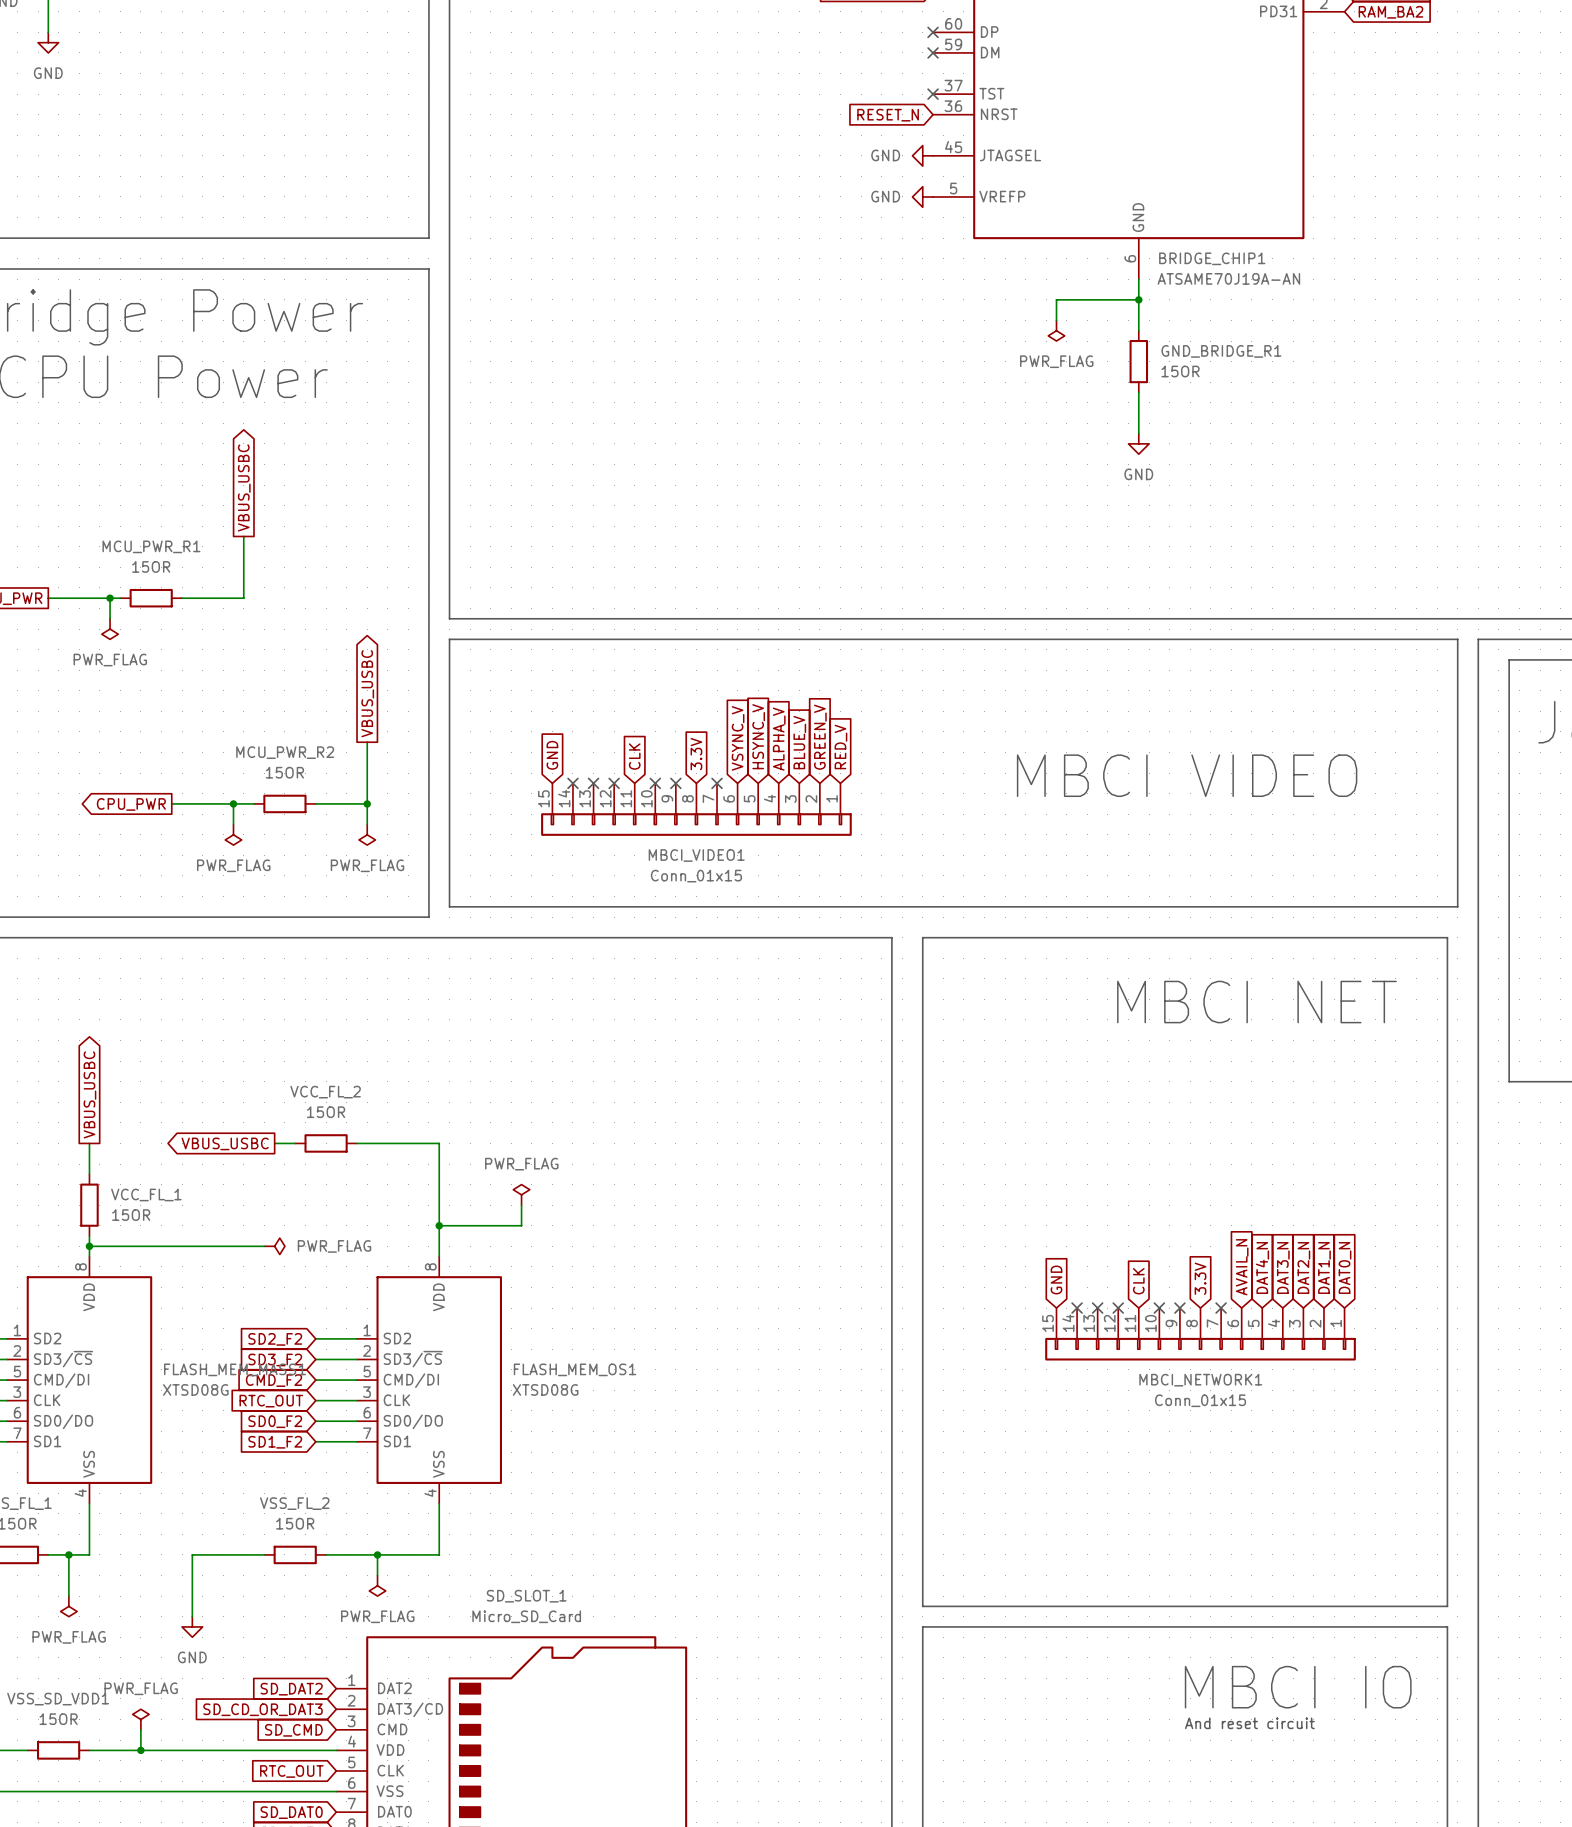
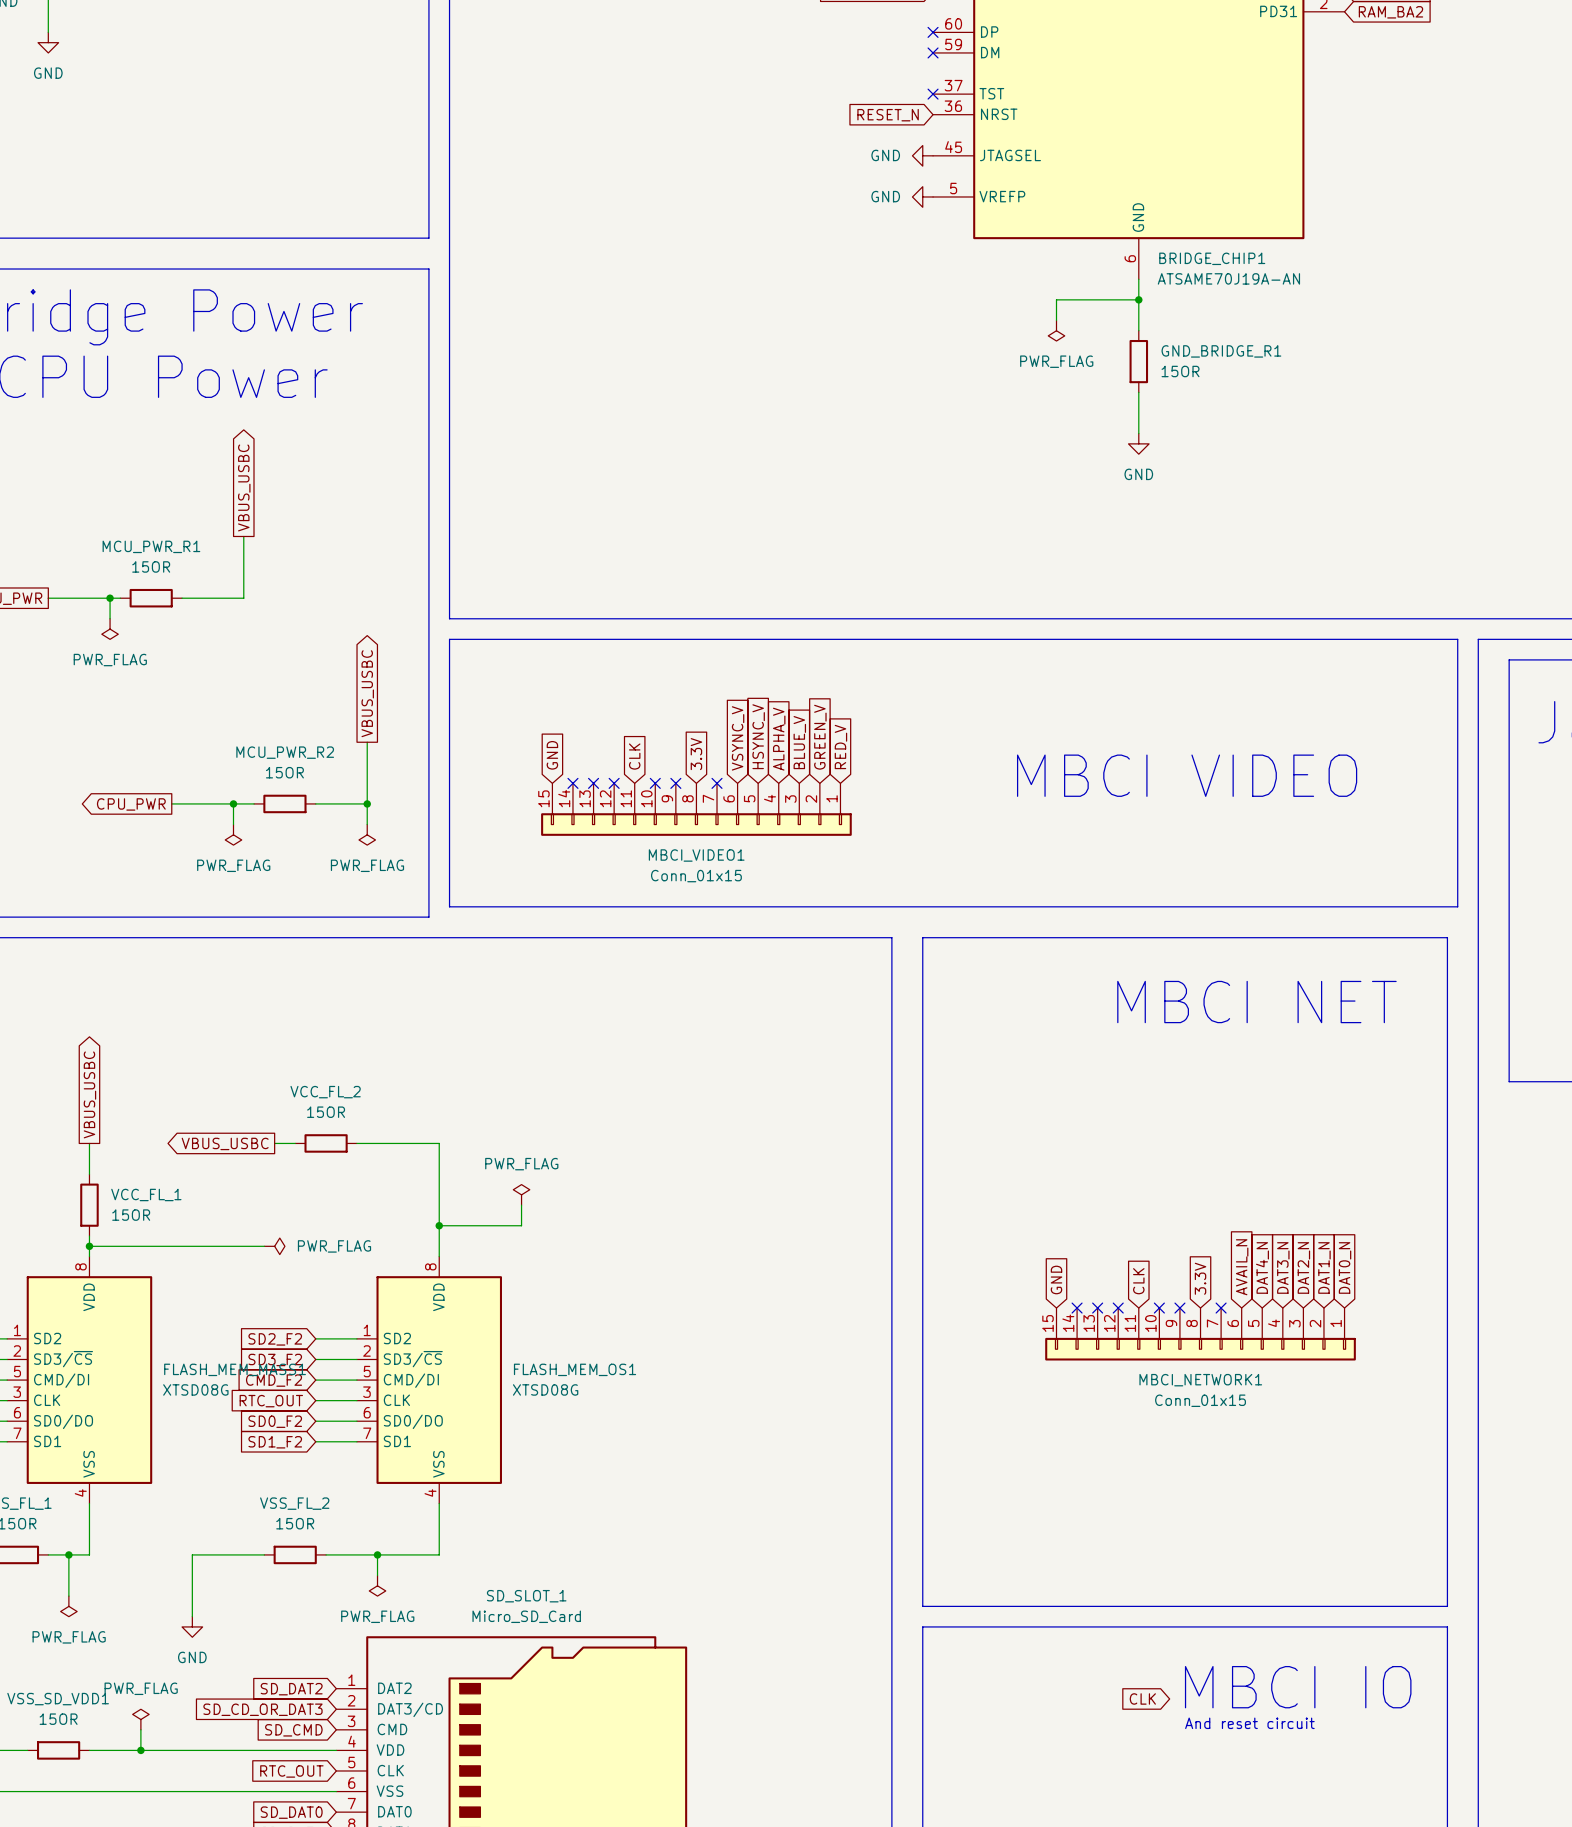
global label: none -> CLK (1142, 1698)

